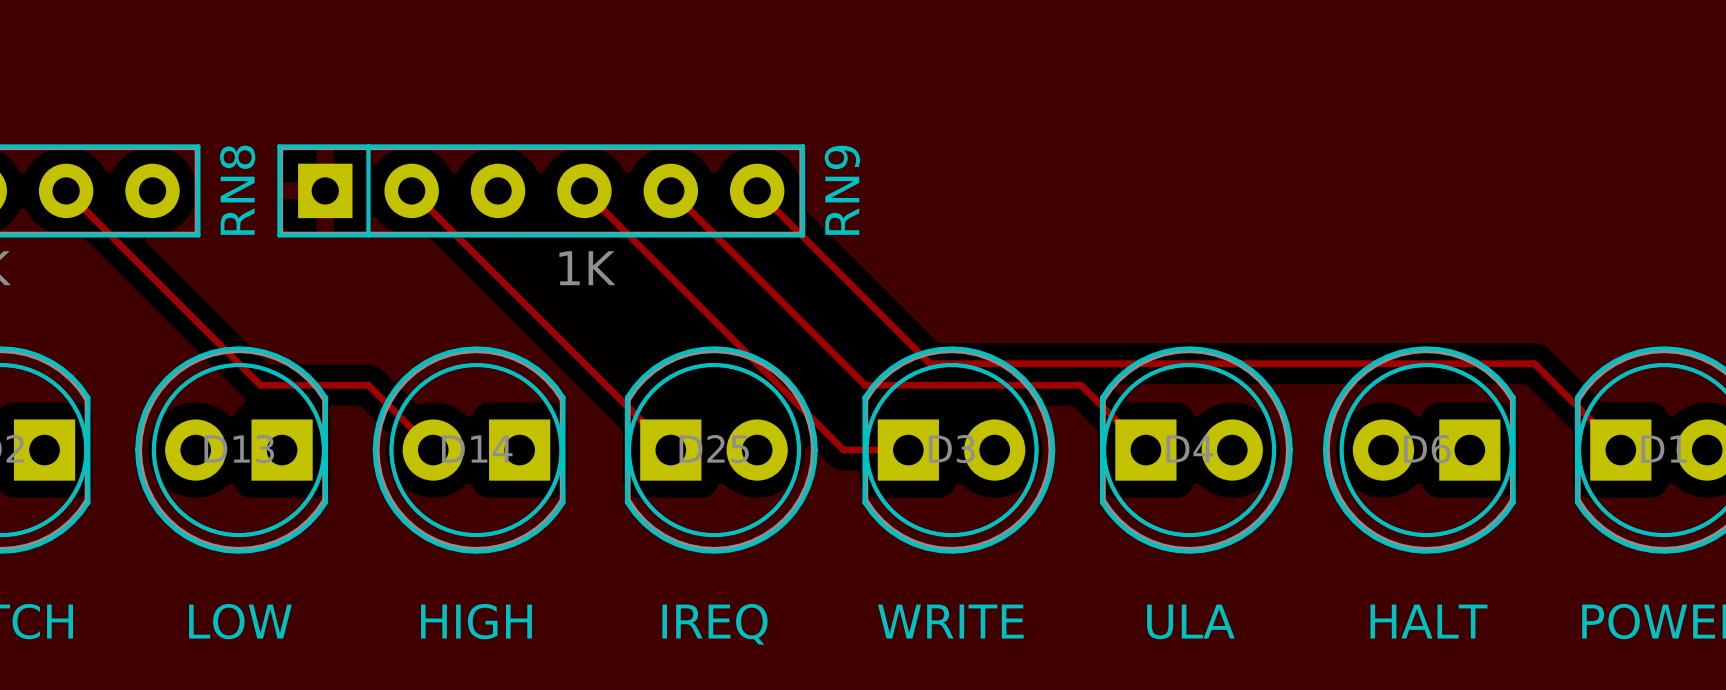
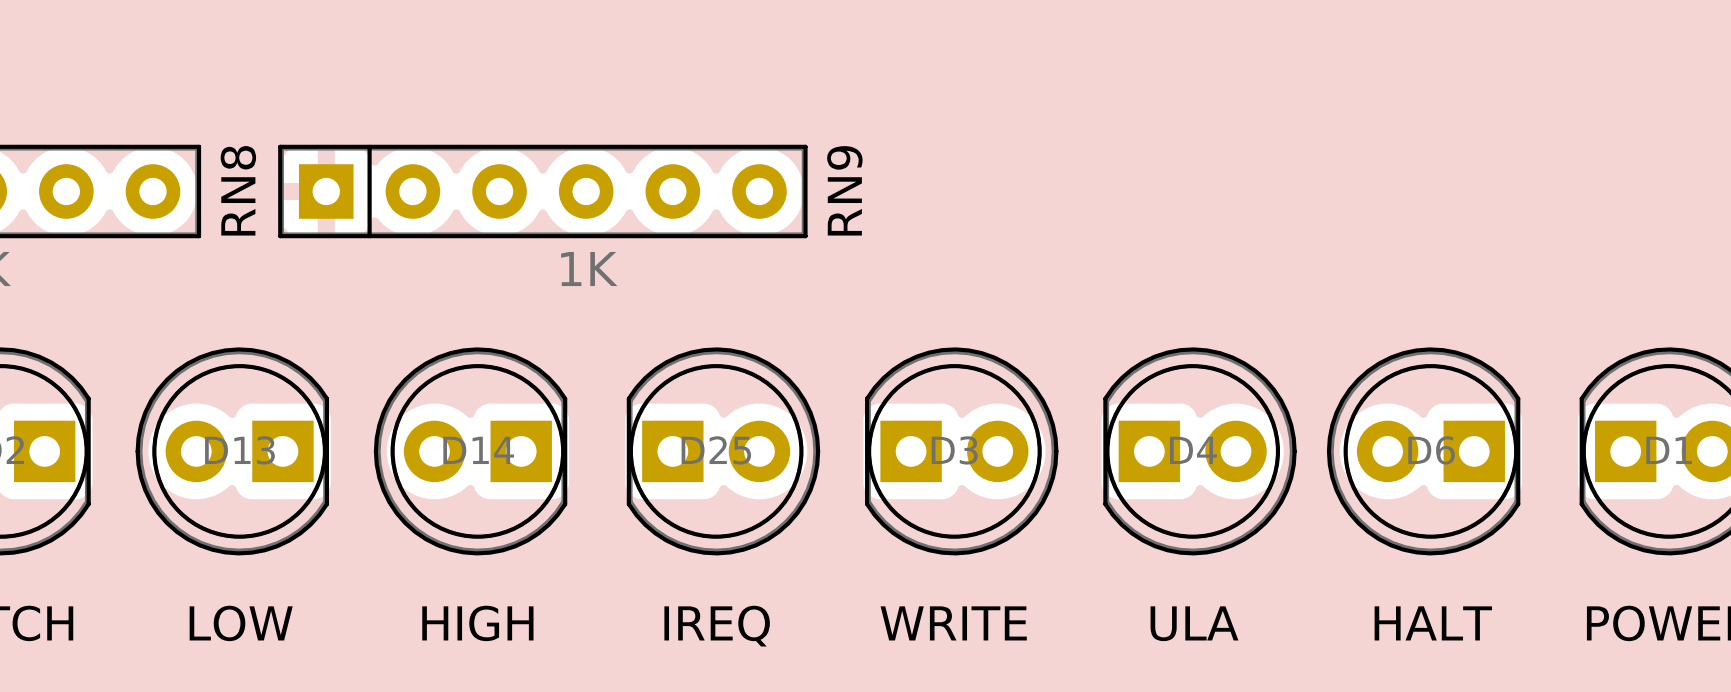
track: (66, 190) (260, 385) (368, 385) (433, 450) -> none
track: (411, 190) (670, 450) -> none
track: (584, 190) (843, 450) (908, 450) -> none
track: (670, 190) (865, 385) (1081, 385) (1145, 450) -> none
track: (757, 190) (929, 363) (1534, 363) (1620, 450) -> none

